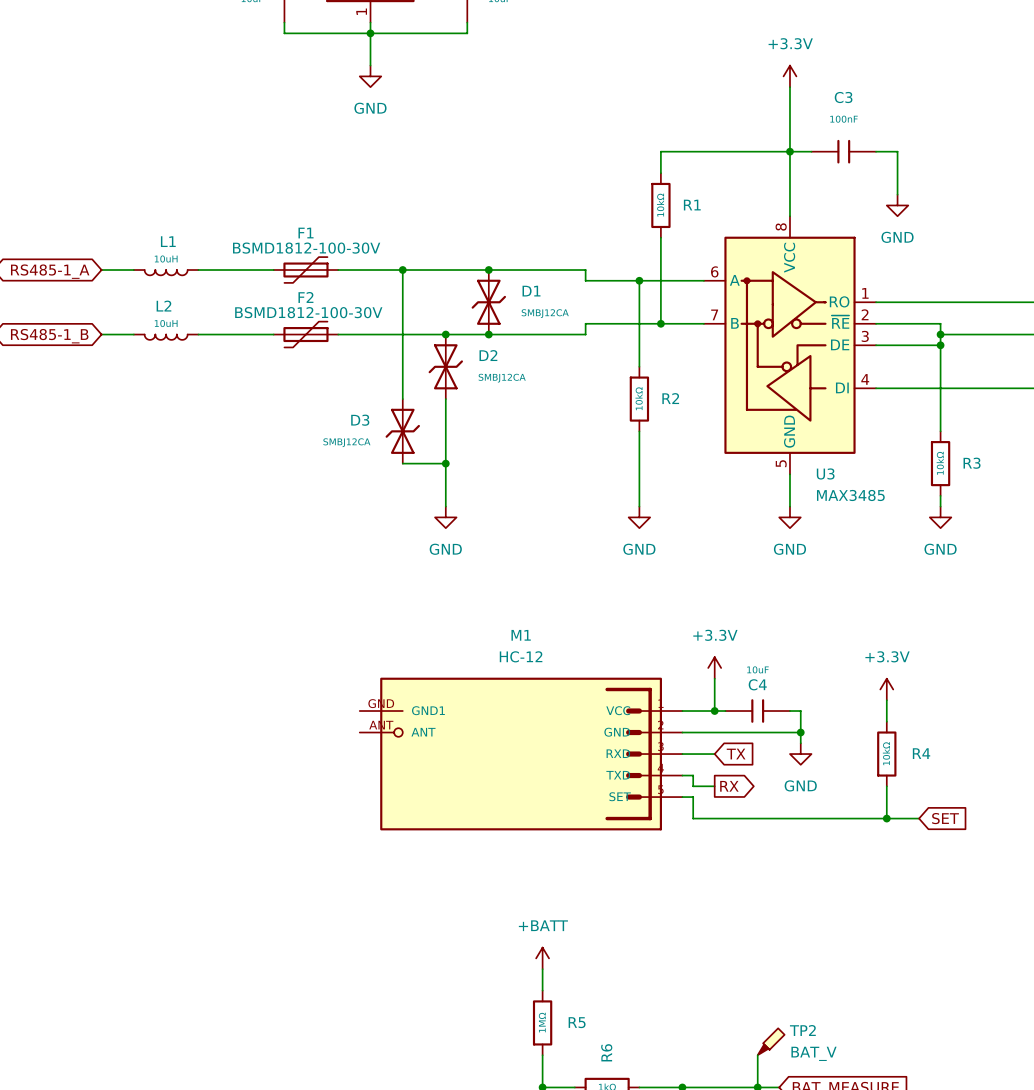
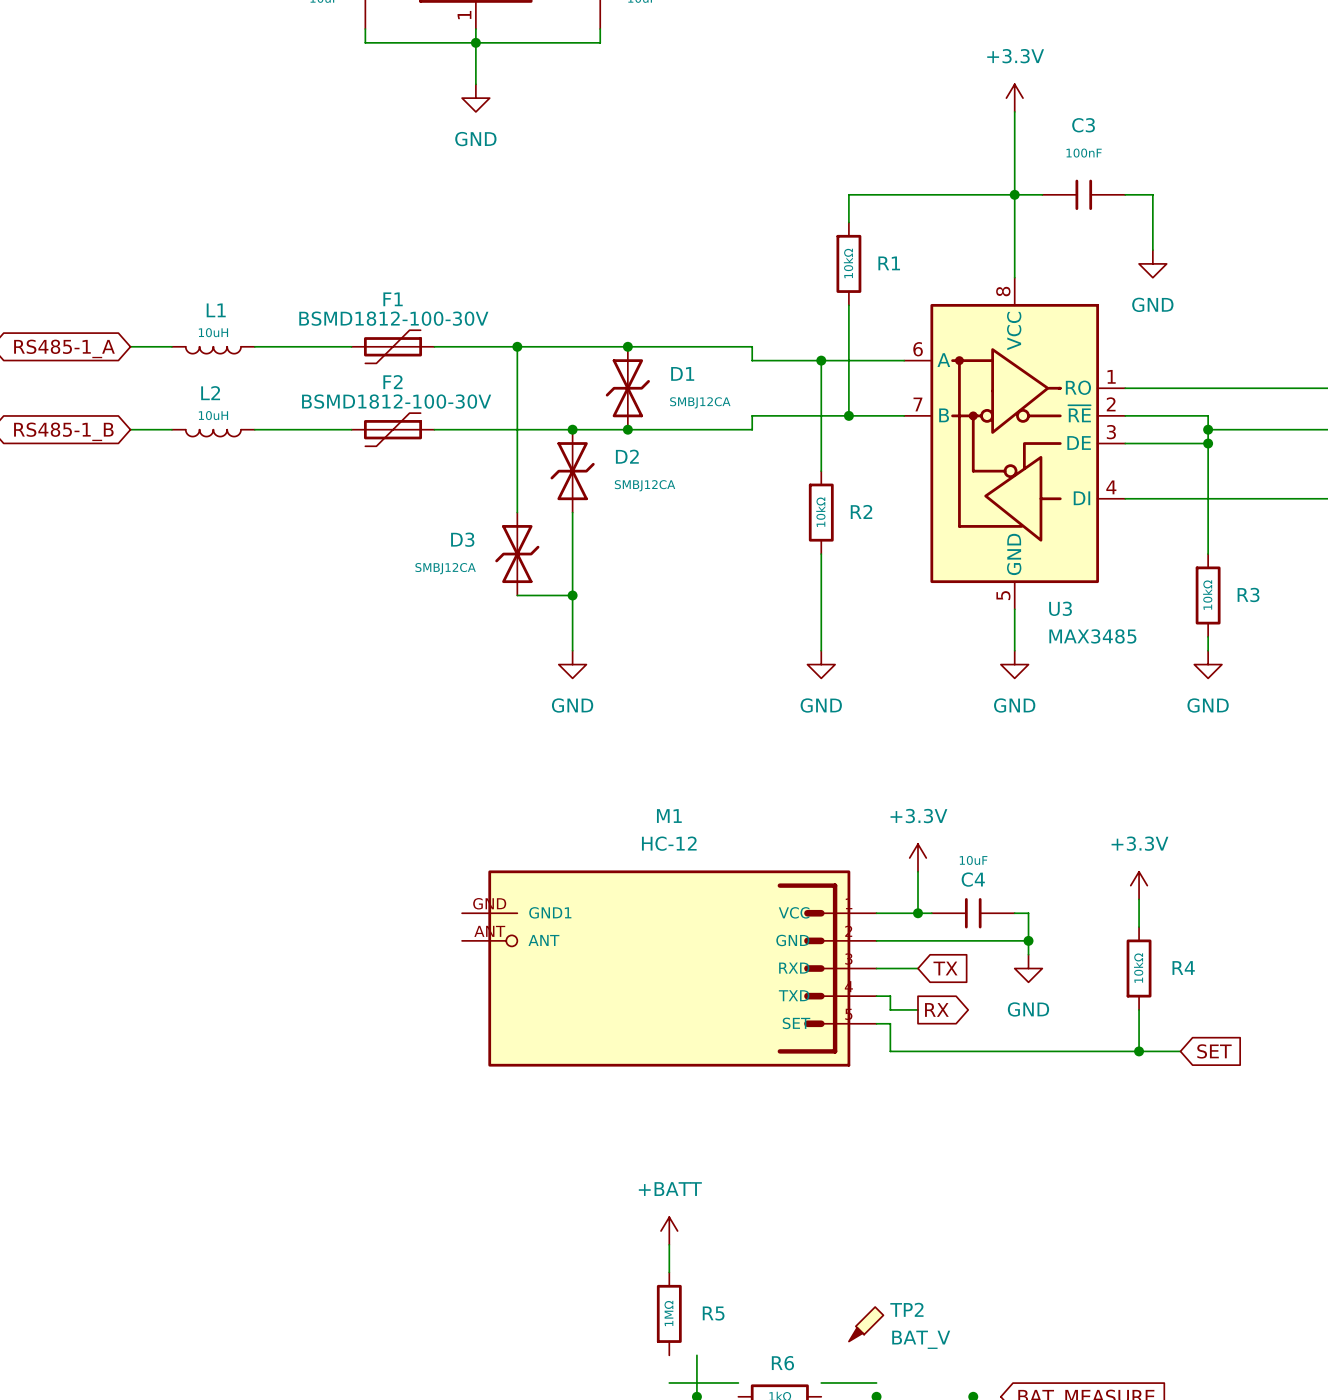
power symbol position: +BATT (542, 958) -> +BATT (669, 1231)
wire: (542, 969) (542, 990) -> (669, 1244) (669, 1272)
R5 position: (542, 1022) -> (669, 1313)
TP2 position: (771, 1041) -> (866, 1324)
R6 name rotation: 0° (606, 1052) -> 90° clockwise (782, 1363)
wire: (757, 1055) (757, 1087) -> none
wire: none -> (669, 1382) (738, 1382)
wire: none -> (821, 1382) (876, 1382)
wire: (542, 1087) (574, 1087) -> none
wire: (639, 1087) (779, 1087) -> none

